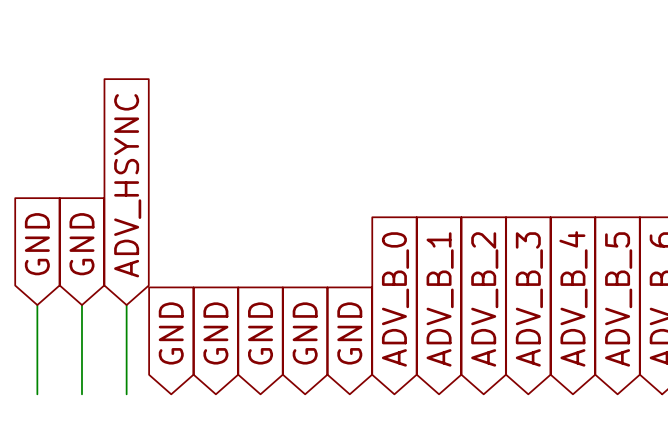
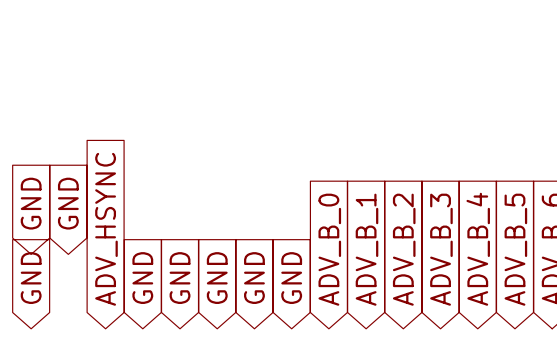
global label position: ADV_HSYNC (127, 185) -> ADV_HSYNC (106, 229)
wire: (37, 305) (37, 394) -> none
wire: (81, 305) (81, 394) -> none
wire: (126, 305) (126, 394) -> none
global label: none -> GND (31, 278)

